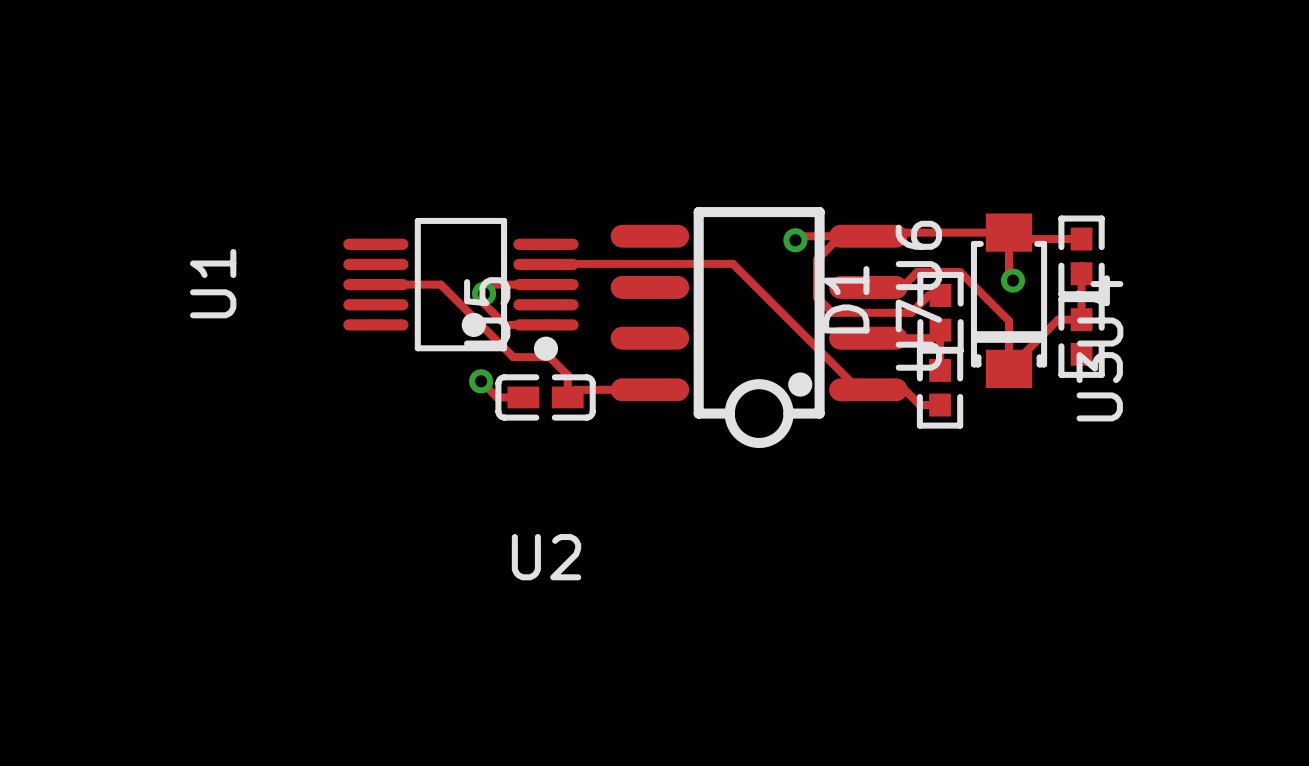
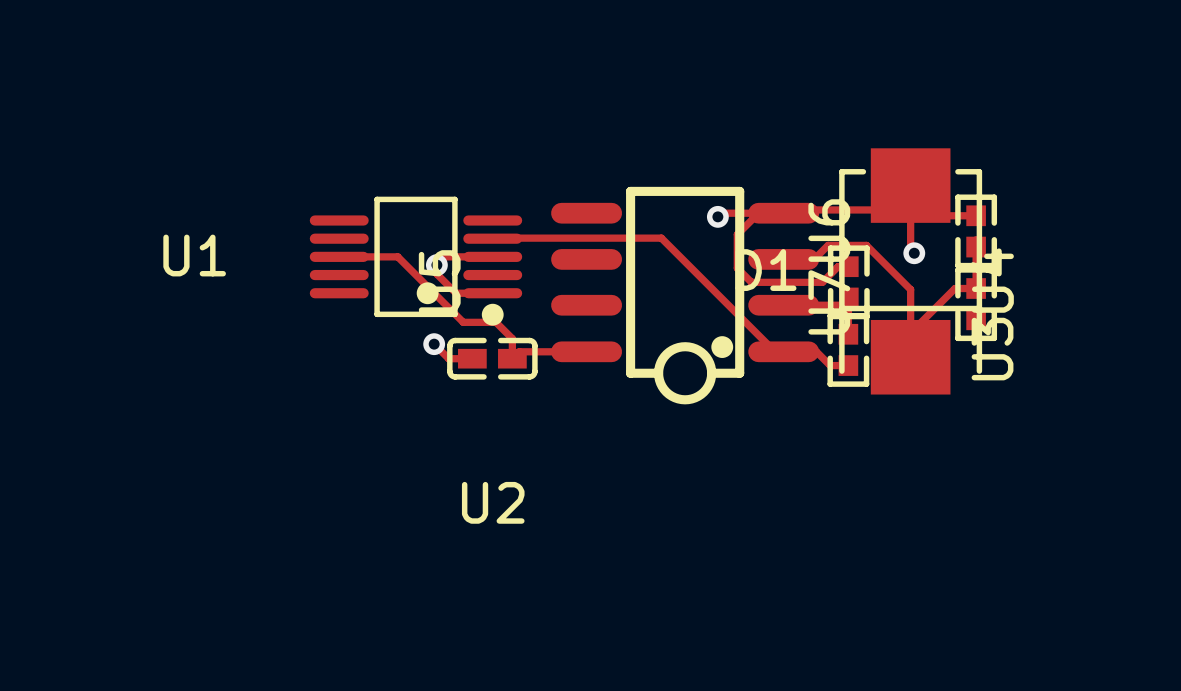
D1 footprint: [970, 213, 1048, 388] -> [839, 148, 983, 395]
U1 name rotation: 0° (213, 283) -> 90° clockwise (194, 255)

